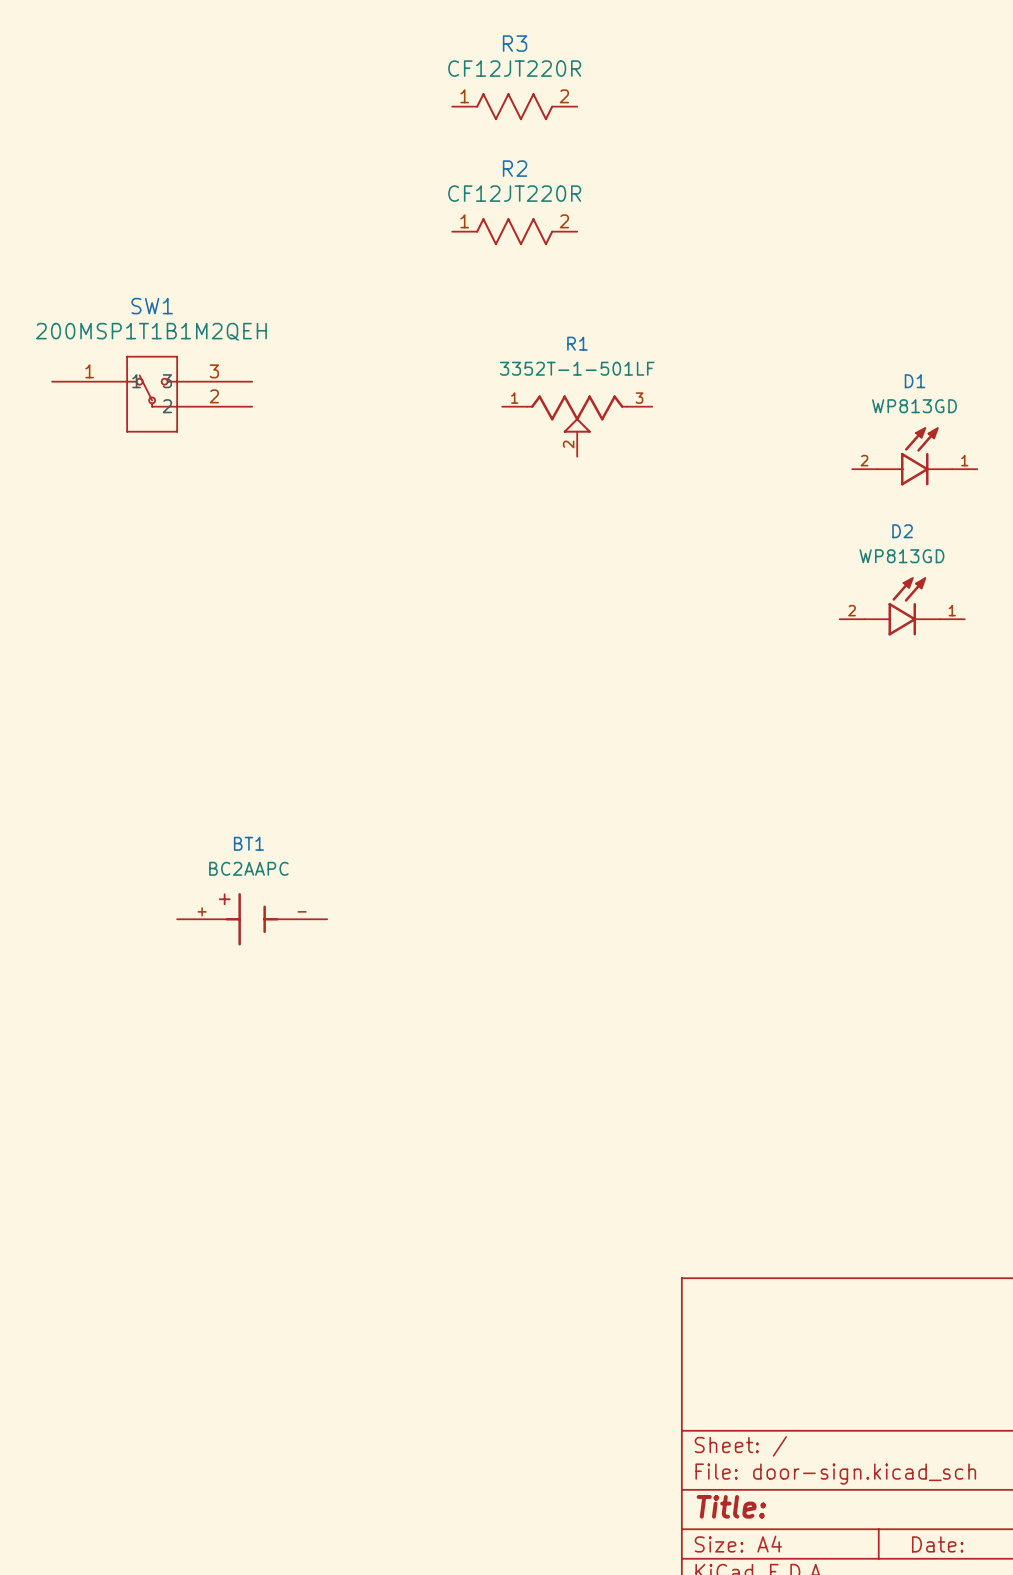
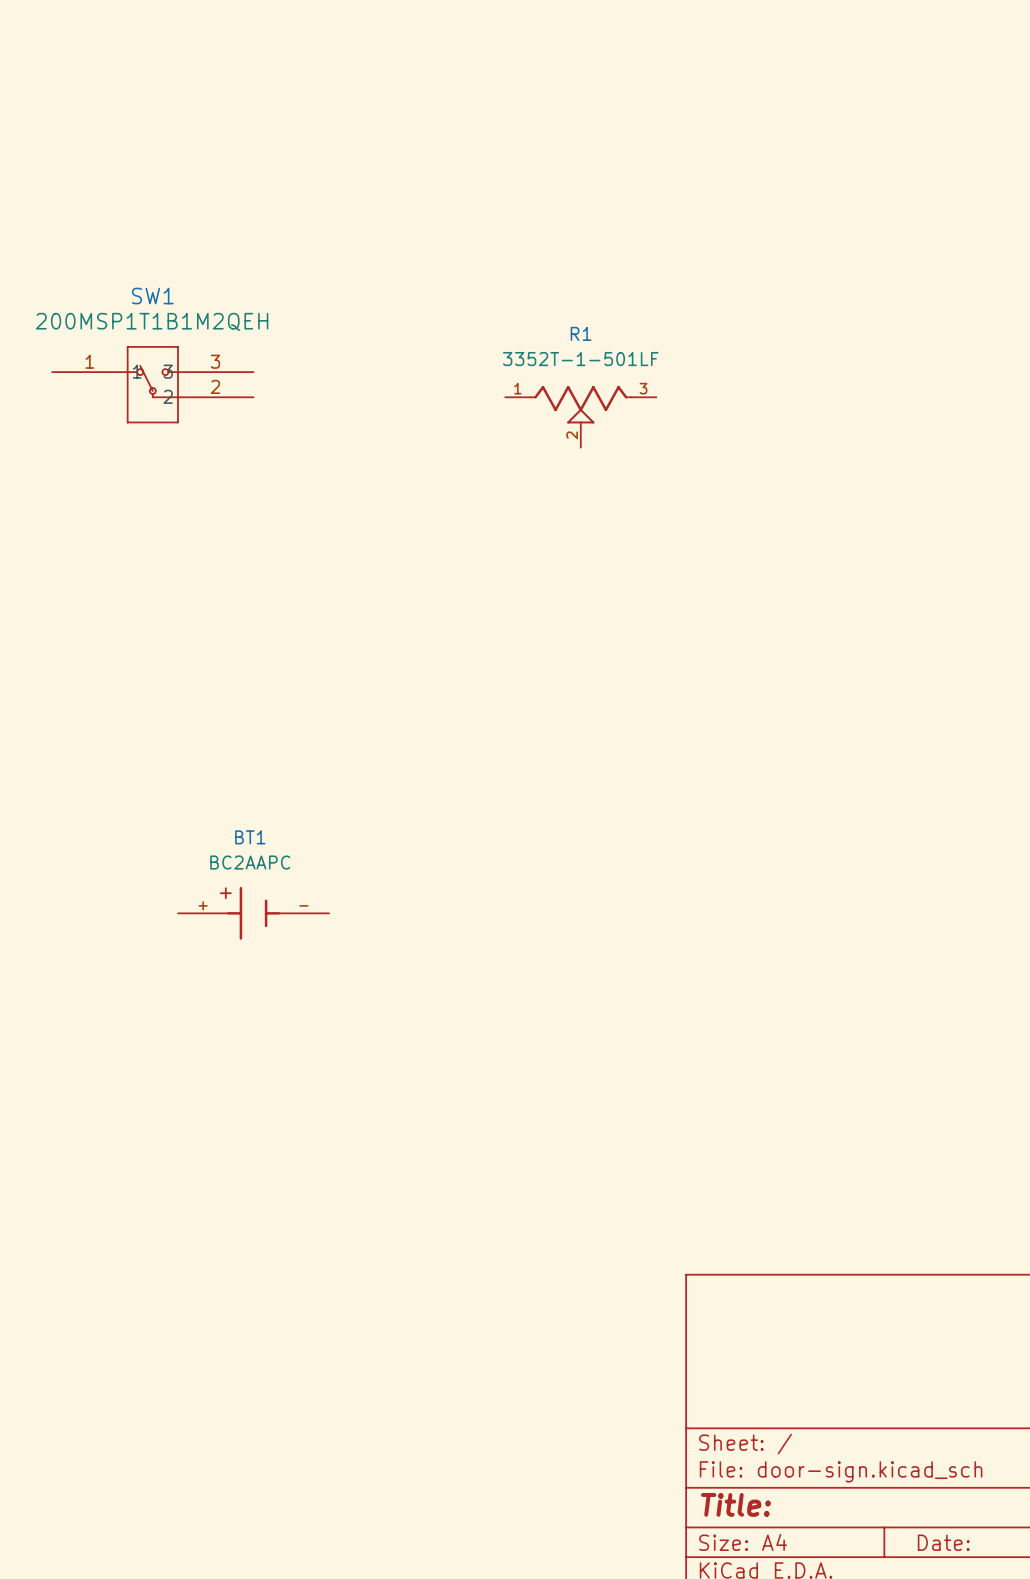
R3: CF12JT220R (514, 106) -> none
R2: CF12JT220R (514, 231) -> none
D1: WP813GD (914, 456) -> none
D2: WP813GD (902, 606) -> none

